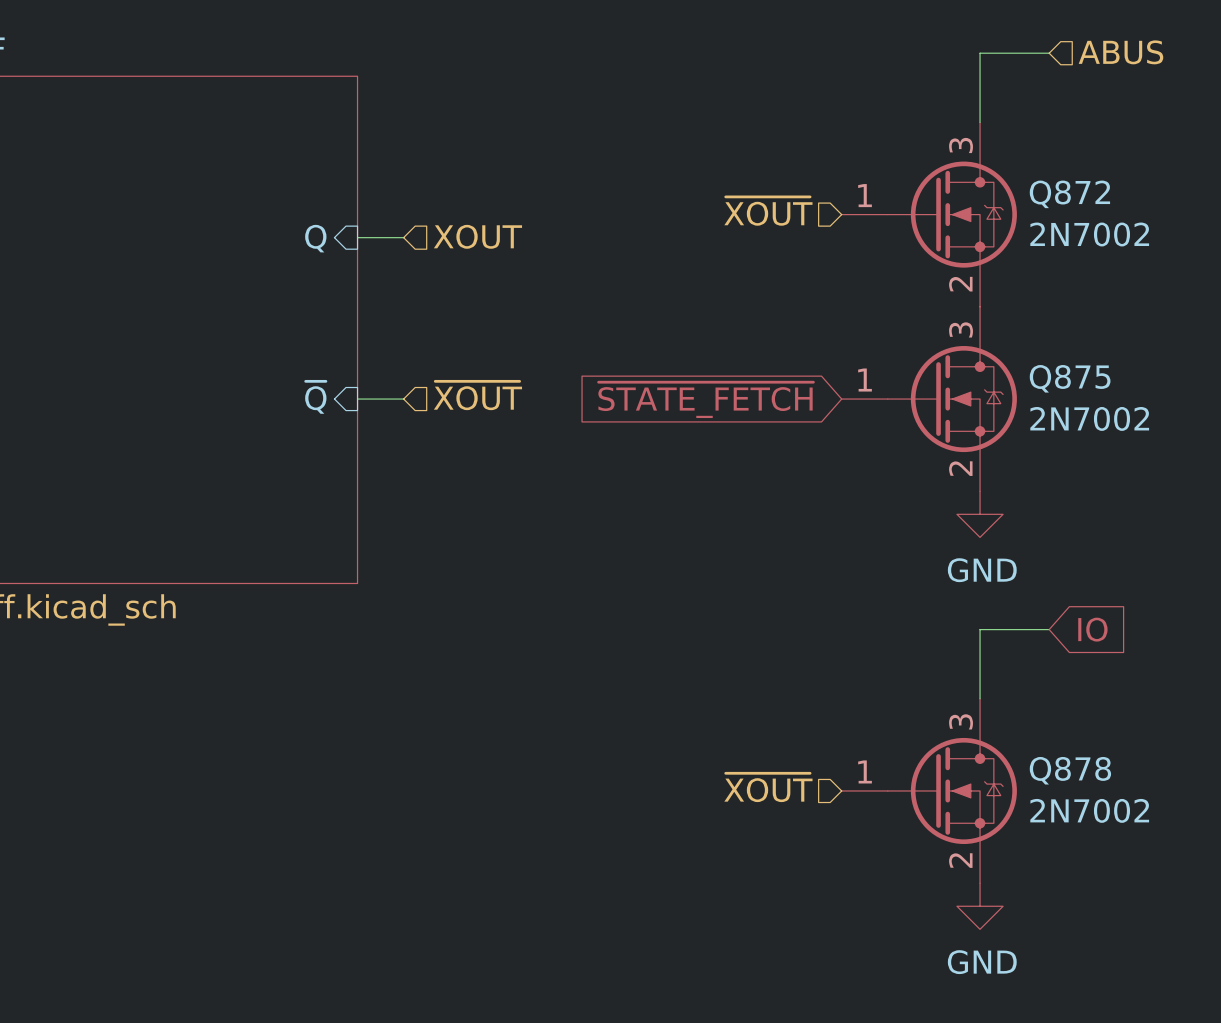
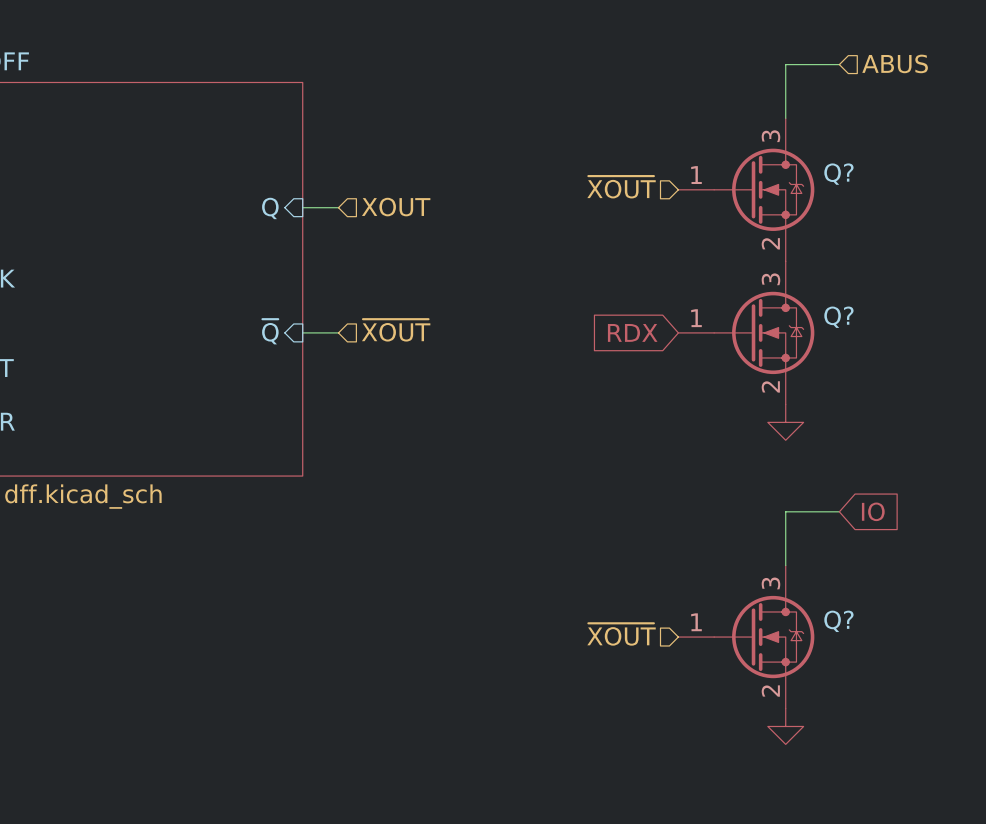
Q872 name: Q872 (1069, 194) -> Q? (838, 174)
Q872 value: 2N7002 (1089, 234) -> none
Q875 name: Q875 (1070, 378) -> Q? (838, 317)
global label: ~{STATE_FETCH} (705, 400) -> RDX (632, 332)
Q875 value: 2N7002 (1089, 418) -> none
power symbol text: GND (982, 570) -> none
Q878 name: Q878 (1070, 770) -> Q? (838, 621)
Q878 value: 2N7002 (1089, 810) -> none
power symbol text: GND (982, 962) -> none

